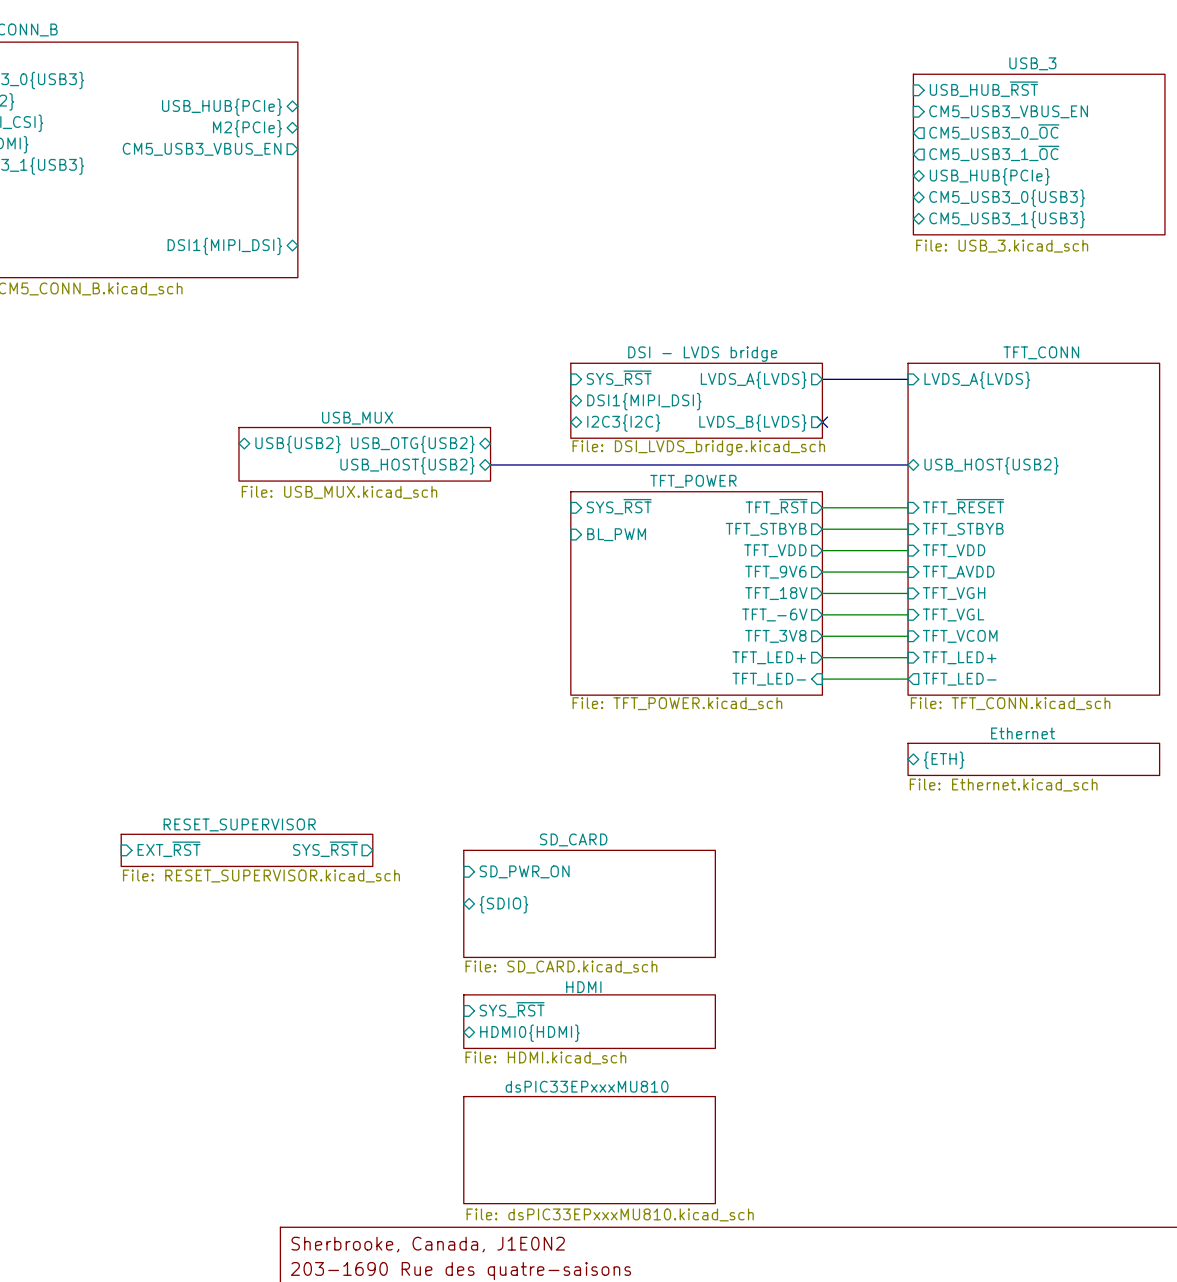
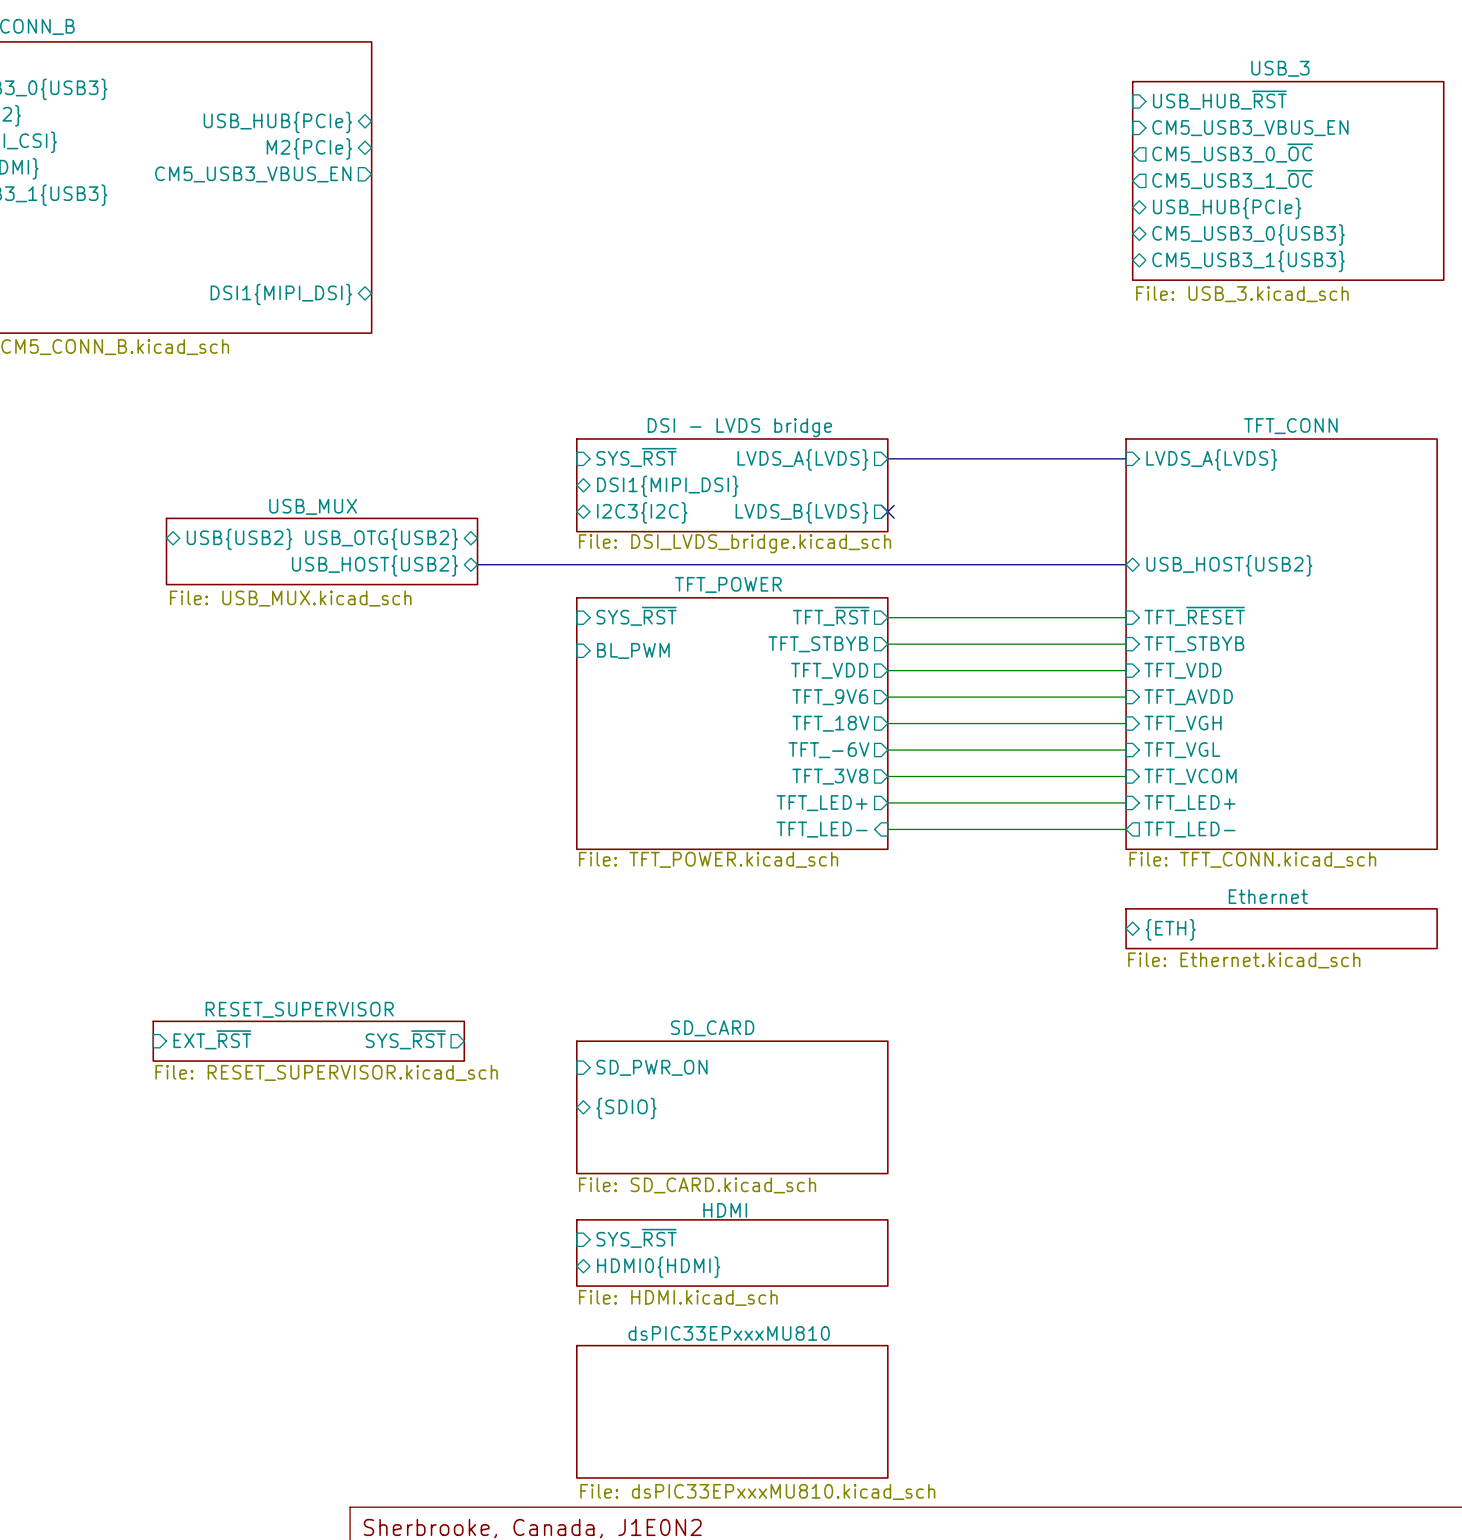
sheet pin position: SYS_~{RST} (619, 378) -> SYS_~{RST} (636, 457)
bus: none -> (887, 458) (1020, 458)
sheet pin position: LVDS_A{LVDS} (753, 380) -> LVDS_A{LVDS} (802, 459)
sheet DSI - LVDS bridge position: (696, 400) -> (732, 485)
sheet pin position: DSI1{MIPI_DSI} (644, 401) -> DSI1{MIPI_DSI} (667, 486)
no-connect mark: none -> (887, 511)
no-connect mark: (822, 422) -> none
sheet pin position: I2C3{I2C} (623, 423) -> I2C3{I2C} (642, 512)
sheet pin position: LVDS_B{LVDS} (752, 423) -> LVDS_B{LVDS} (801, 512)
sheet pin position: USB{USB2} (298, 444) -> USB{USB2} (239, 539)
sheet pin position: USB_OTG{USB2} (412, 444) -> USB_OTG{USB2} (381, 539)
sheet USB_MUX position: (364, 454) -> (322, 551)
bus: none -> (477, 564) (609, 564)
sheet pin position: USB_HOST{USB2} (407, 465) -> USB_HOST{USB2} (374, 565)
sheet pin position: SYS_~{RST} (619, 506) -> SYS_~{RST} (636, 616)
sheet pin position: TFT_~{RST} (776, 506) -> TFT_~{RST} (831, 616)
wire: none -> (887, 617) (1020, 617)
wire: none -> (887, 644) (1020, 644)
sheet pin position: TFT_STBYB (766, 529) -> TFT_STBYB (818, 644)
sheet pin position: BL_PWM (616, 534) -> BL_PWM (633, 650)
wire: none -> (887, 670) (1020, 670)
sheet pin position: TFT_VDD (775, 550) -> TFT_VDD (829, 670)
wire: none -> (887, 697) (1020, 697)
sheet pin position: TFT_9V6 (775, 572) -> TFT_9V6 (830, 697)
sheet TFT_POWER position: (696, 593) -> (732, 723)
wire: none -> (887, 723) (1020, 723)
sheet pin position: TFT_18V (776, 593) -> TFT_18V (830, 723)
wire: none -> (887, 750) (1020, 750)
sheet pin position: TFT_-6V (774, 614) -> TFT_-6V (829, 750)
wire: none -> (887, 776) (1020, 776)
sheet pin position: TFT_3V8 (775, 636) -> TFT_3V8 (830, 776)
wire: none -> (887, 802) (1020, 802)
sheet pin position: TFT_LED+ (769, 657) -> TFT_LED+ (822, 803)
wire: none -> (887, 829) (1020, 829)
sheet pin position: TFT_LED- (769, 679) -> TFT_LED- (822, 829)

